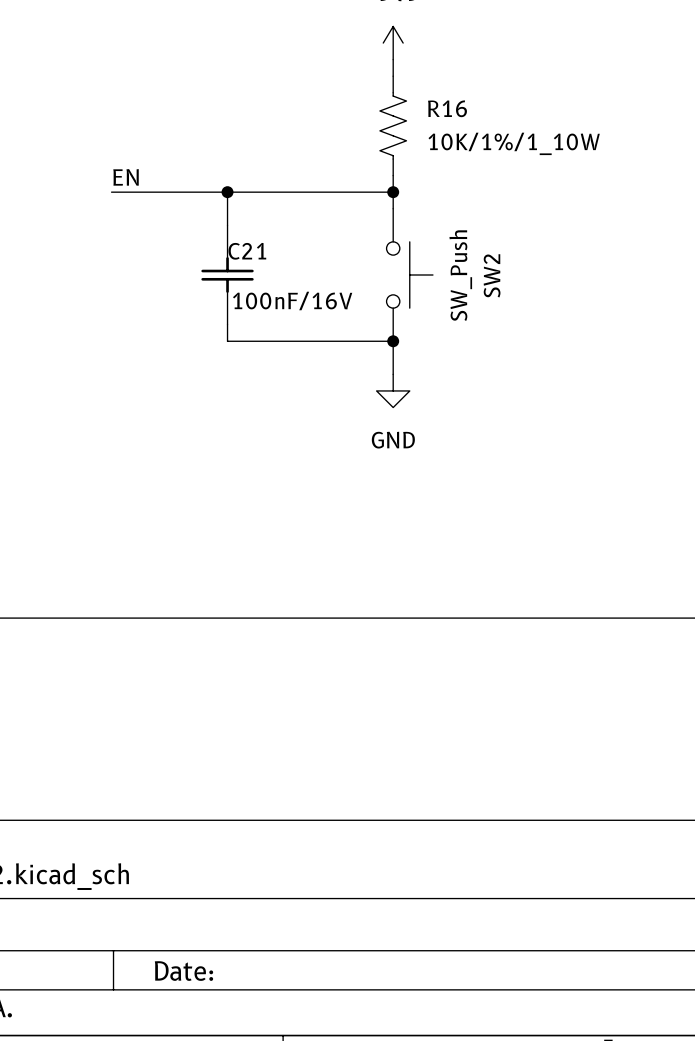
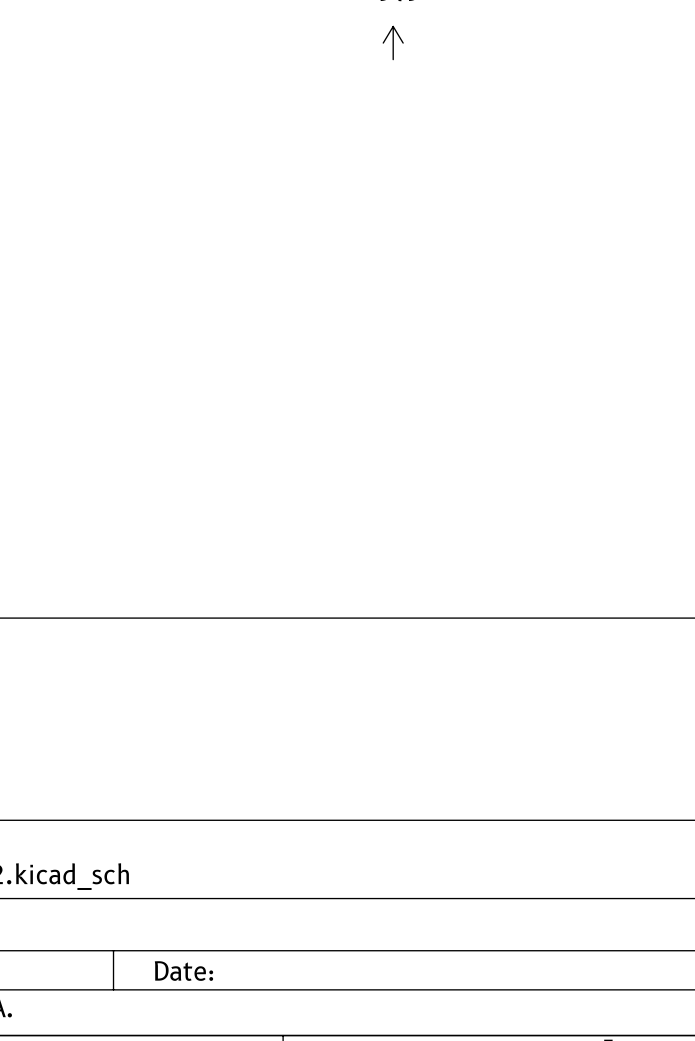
wire: (393, 59) (393, 76) -> none
R16: 10K/1%/1_10W (393, 125) -> none
wire: (393, 175) (393, 208) -> none
label: EN (126, 177) -> none
wire: (111, 192) (393, 192) -> none
wire: (227, 192) (227, 225) -> none
junction: (227, 192) -> none
junction: (393, 192) -> none
C21: 100nF/16V (227, 275) -> none
SW2: SW_Push (409, 275) -> none
wire: (227, 324) (227, 341) (393, 341) (393, 374) -> none
junction: (393, 341) -> none
power symbol: GND (393, 390) -> none

